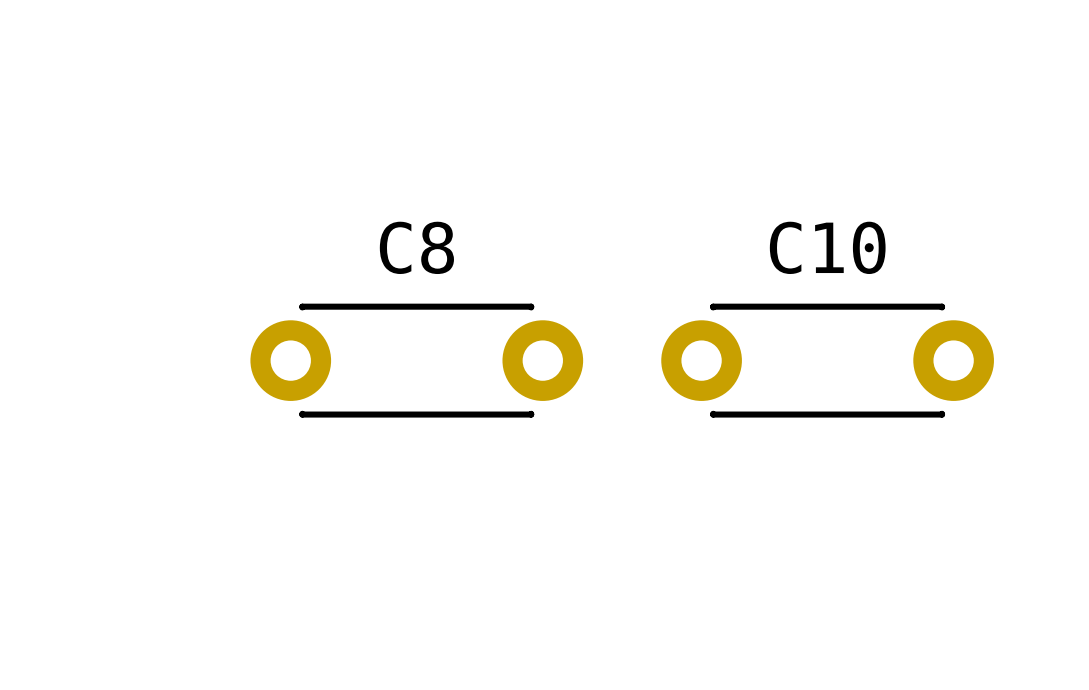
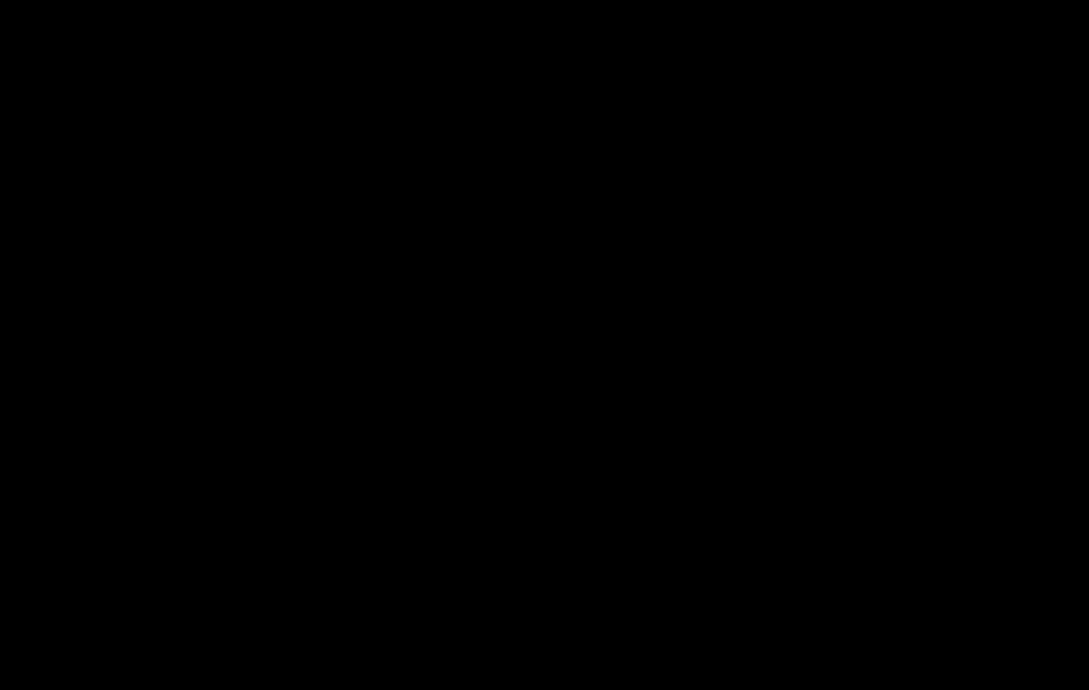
C8: (416, 360) -> none
C10: (827, 360) -> none

